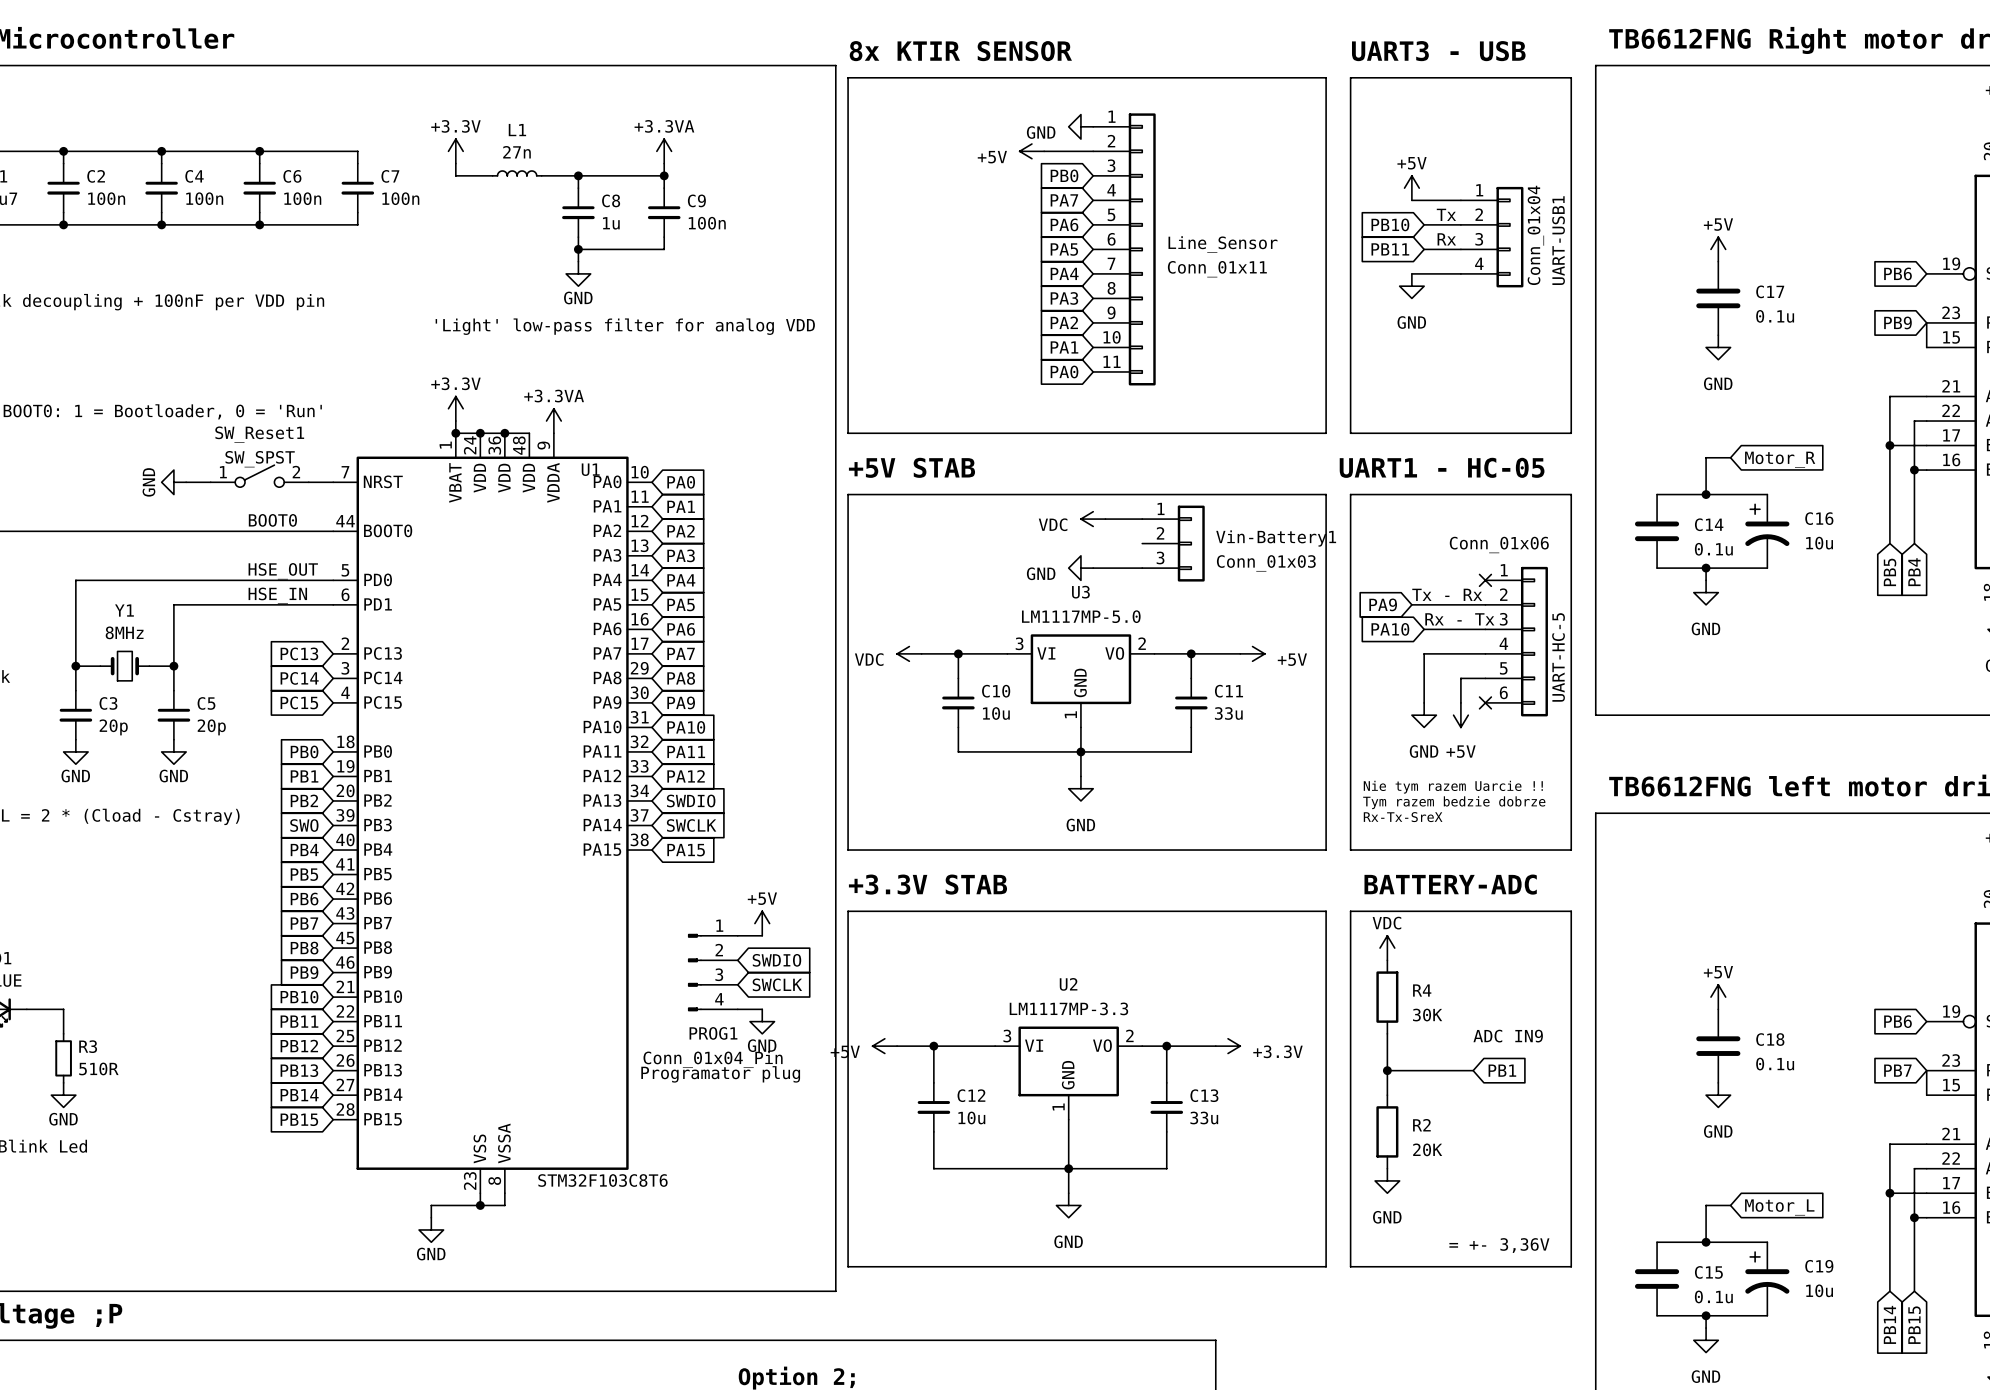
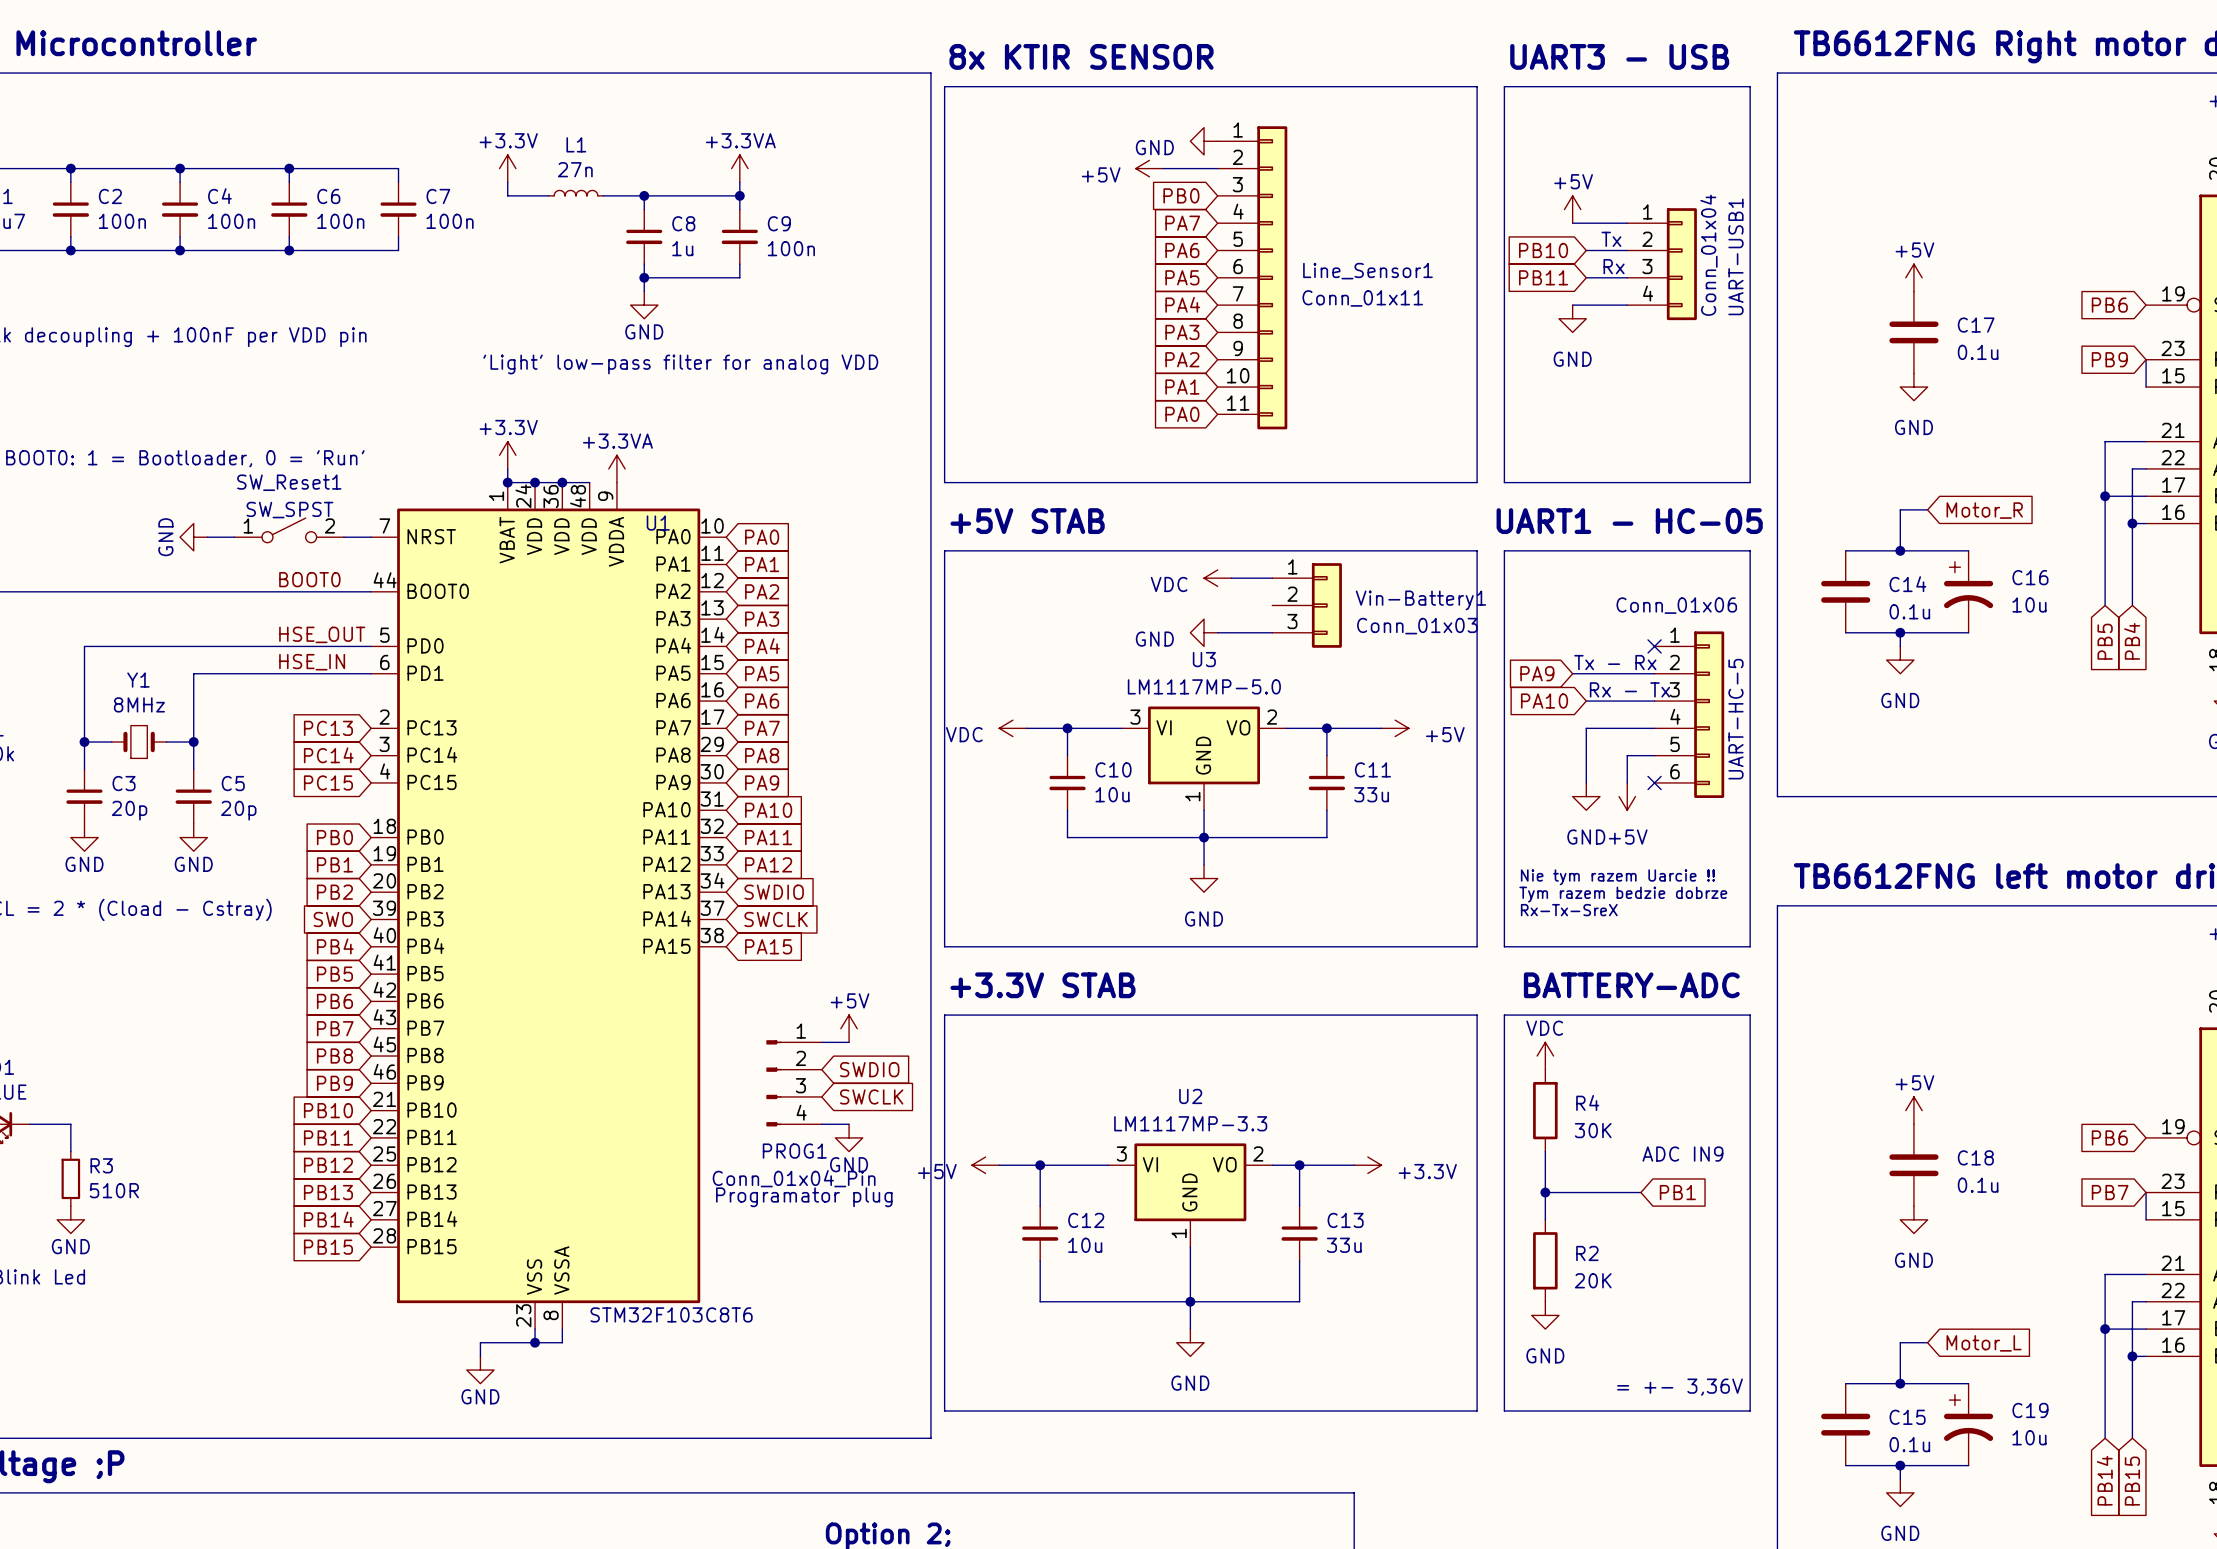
Line_Sensor name: Line_Sensor (1222, 244) -> Line_Sensor1 (1367, 271)

